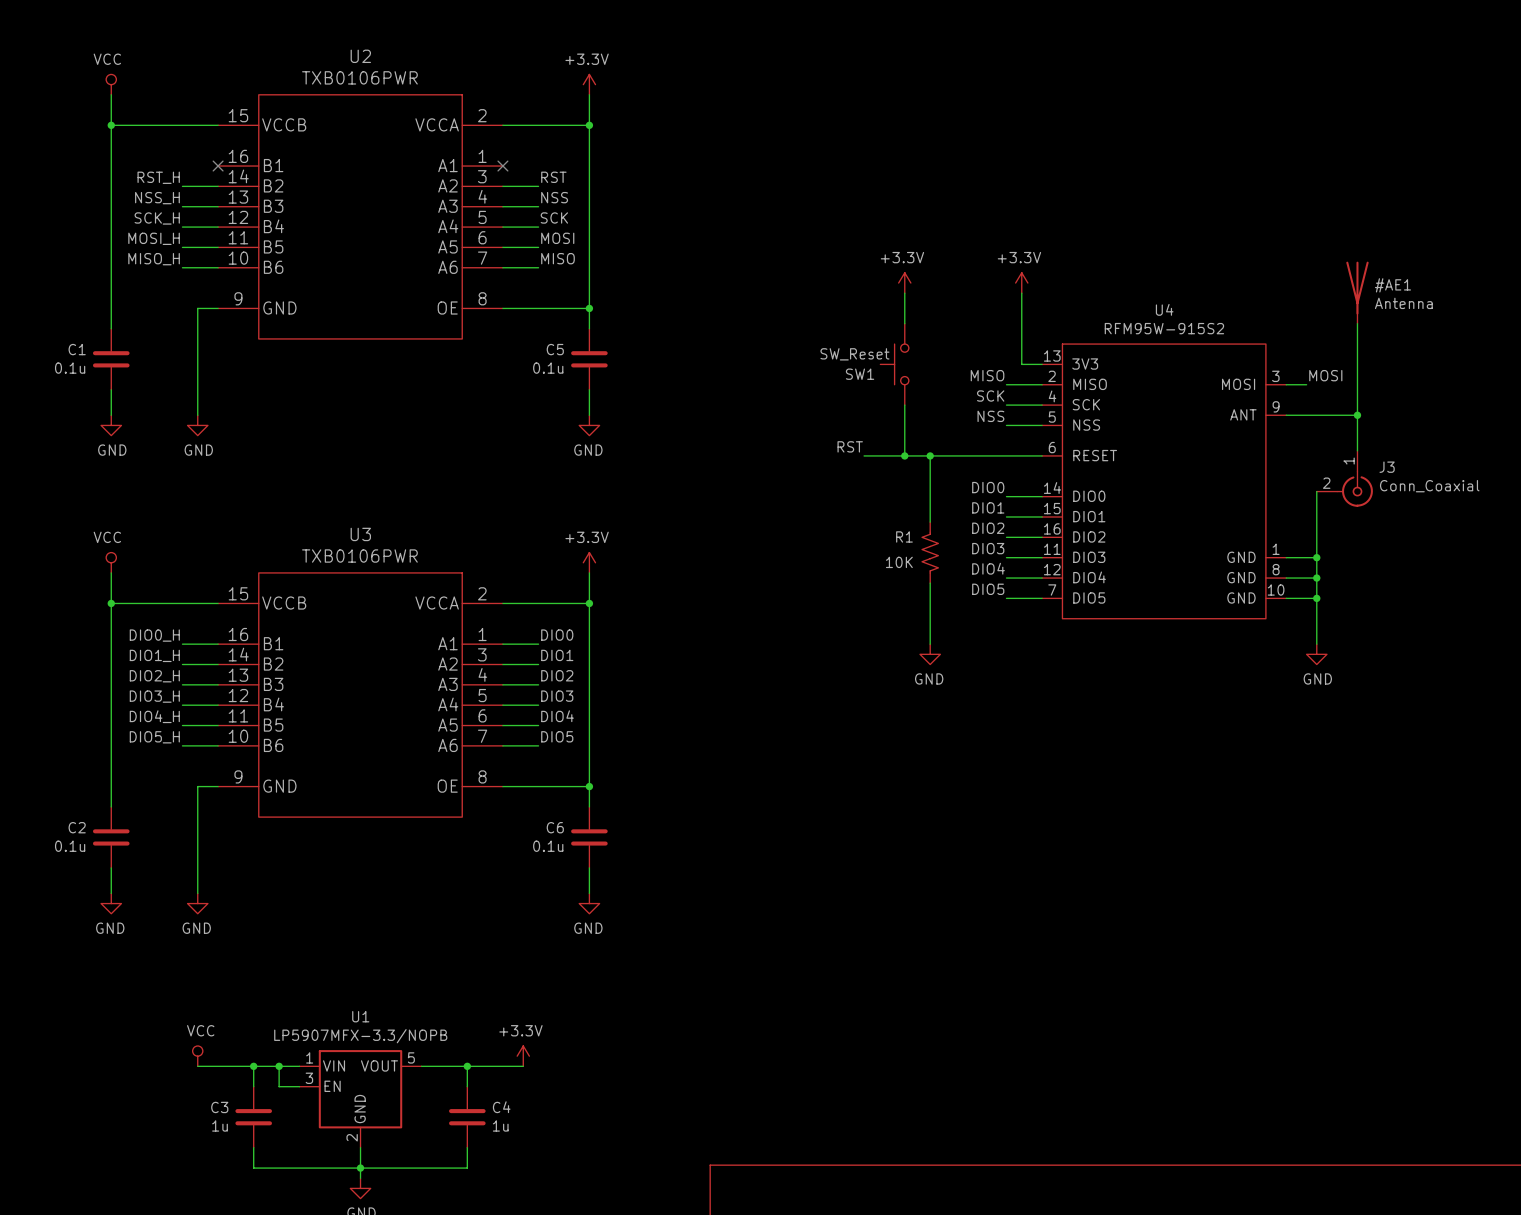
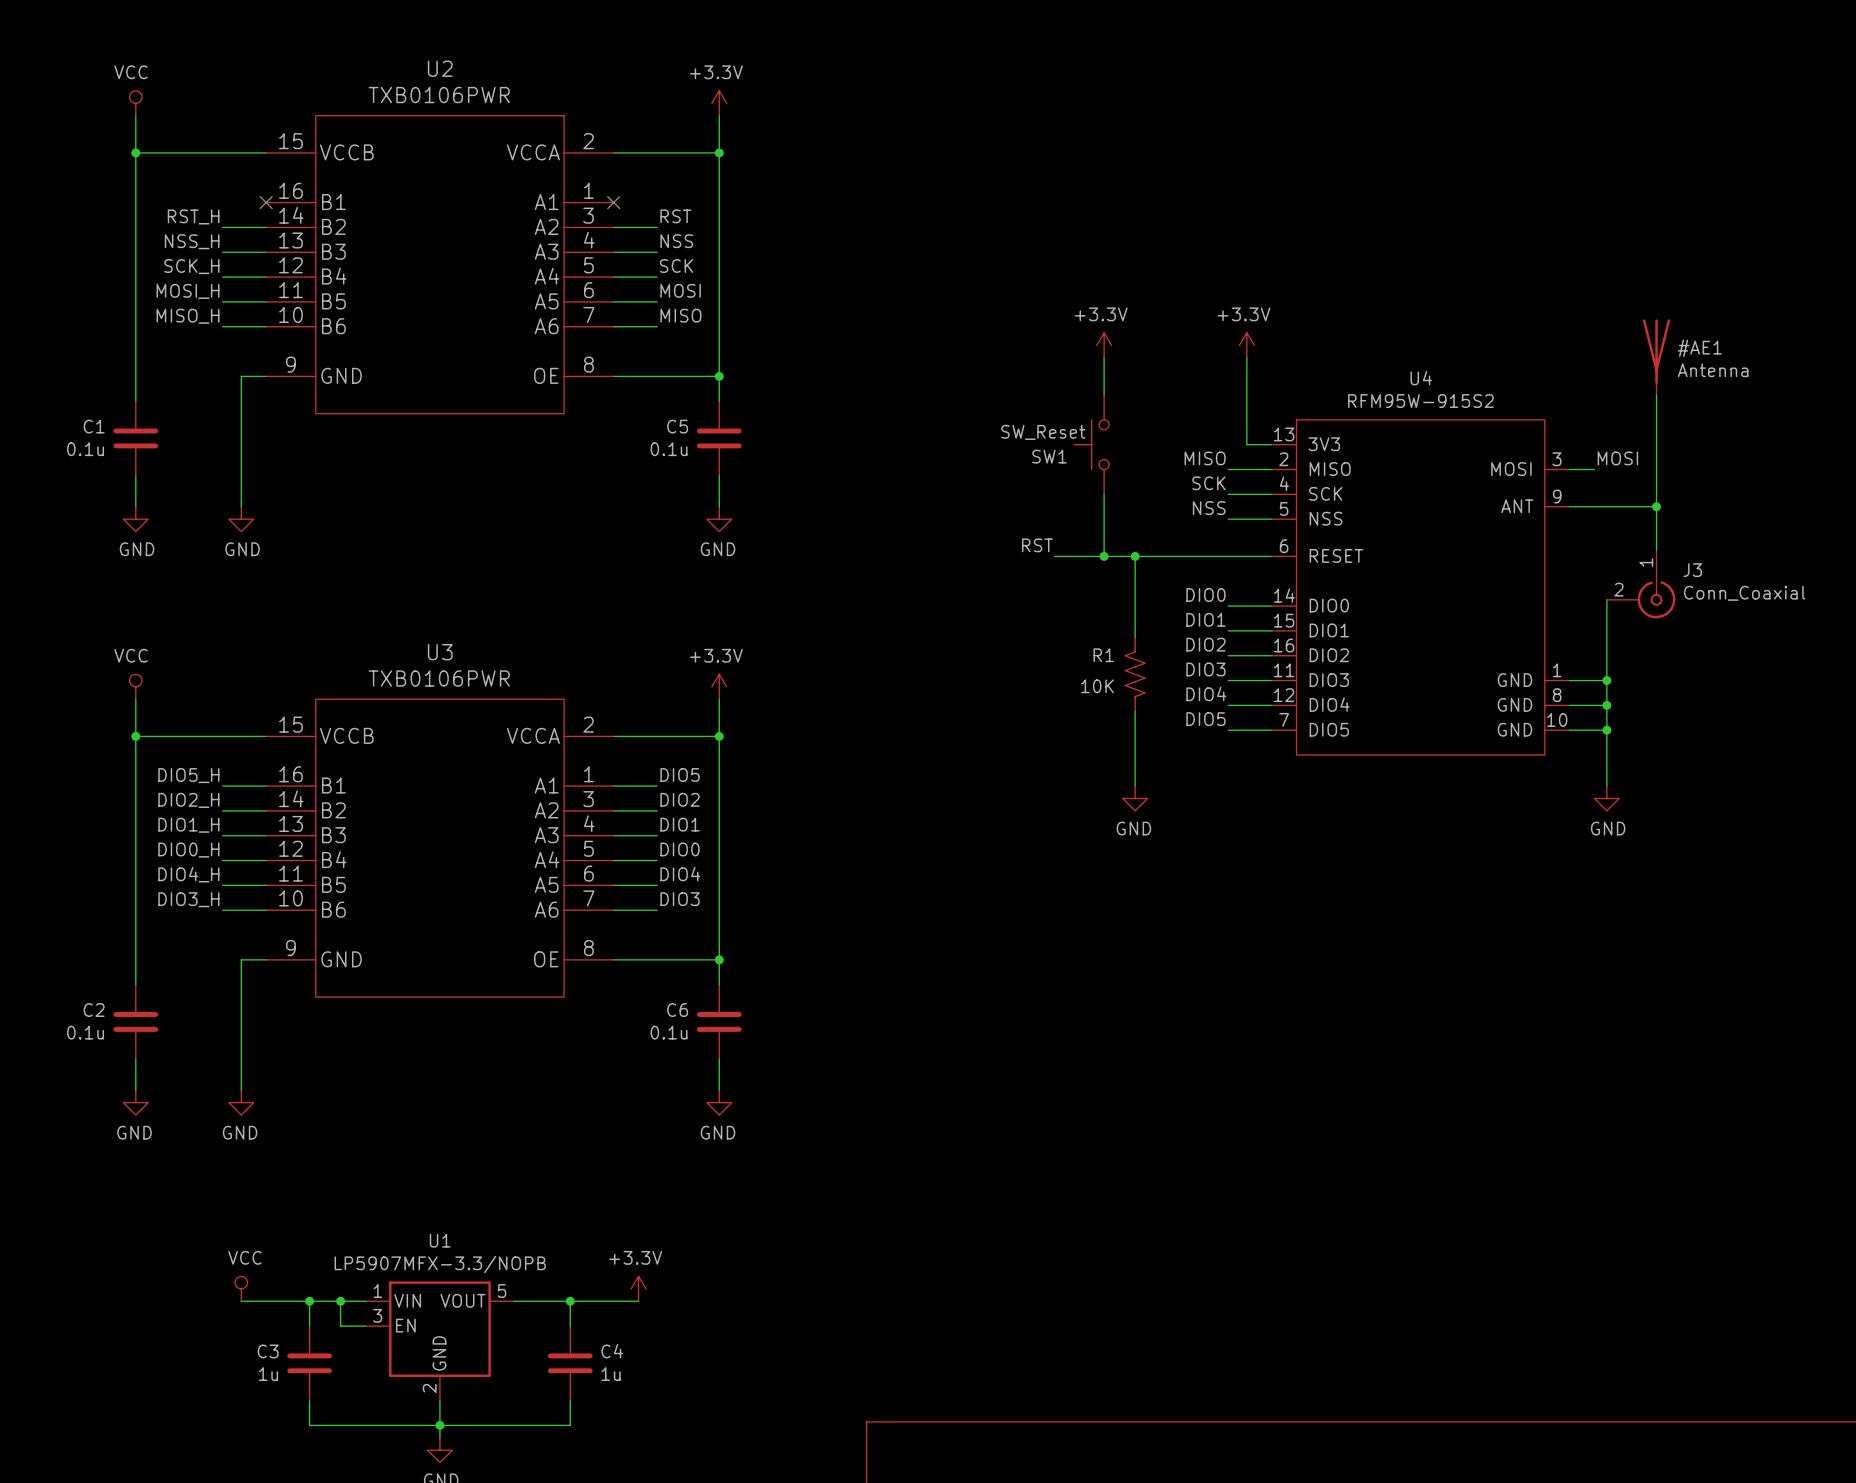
label: DIO0_H (154, 635) -> DIO5_H (188, 775)
label: DIO0 (557, 635) -> DIO5 (680, 774)
label: DIO1_H (154, 655) -> DIO2_H (188, 800)
label: DIO1 (557, 655) -> DIO2 (680, 799)
label: DIO2 (557, 675) -> DIO1 (680, 824)
label: DIO2_H (154, 676) -> DIO1_H (188, 825)
label: DIO3_H (154, 696) -> DIO0_H (188, 850)
label: DIO3 (557, 696) -> DIO0 (680, 849)
label: DIO5 (557, 736) -> DIO3 (680, 899)
label: DIO5_H (154, 737) -> DIO3_H (188, 899)

